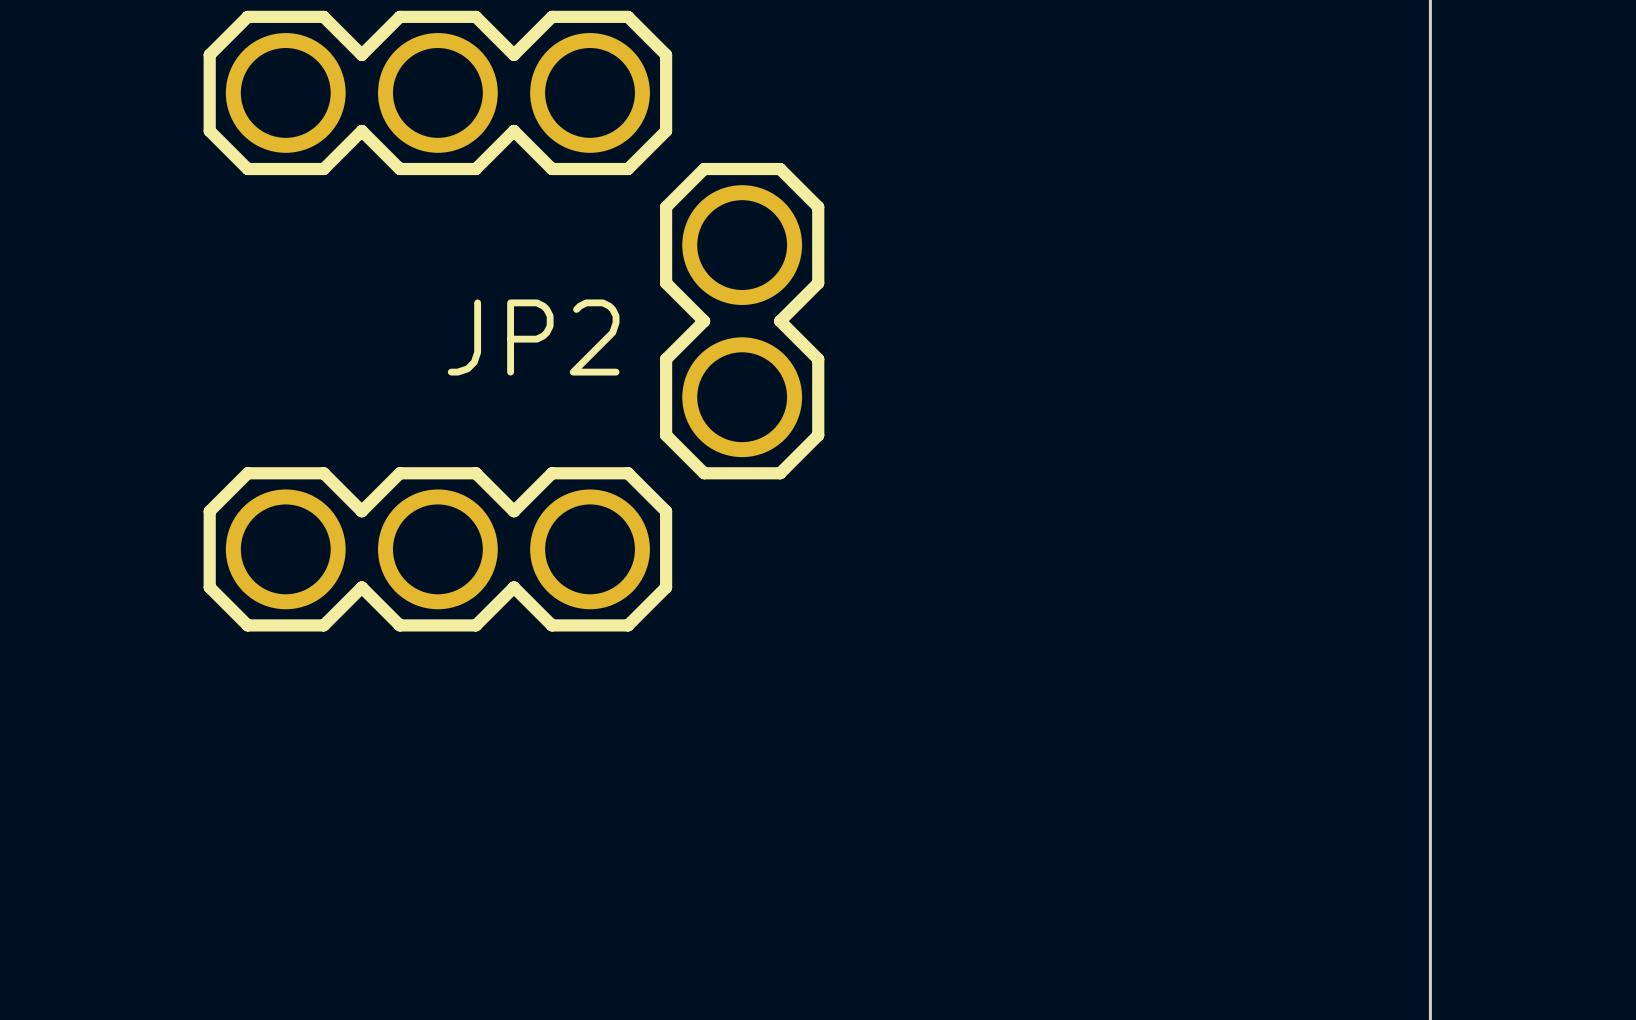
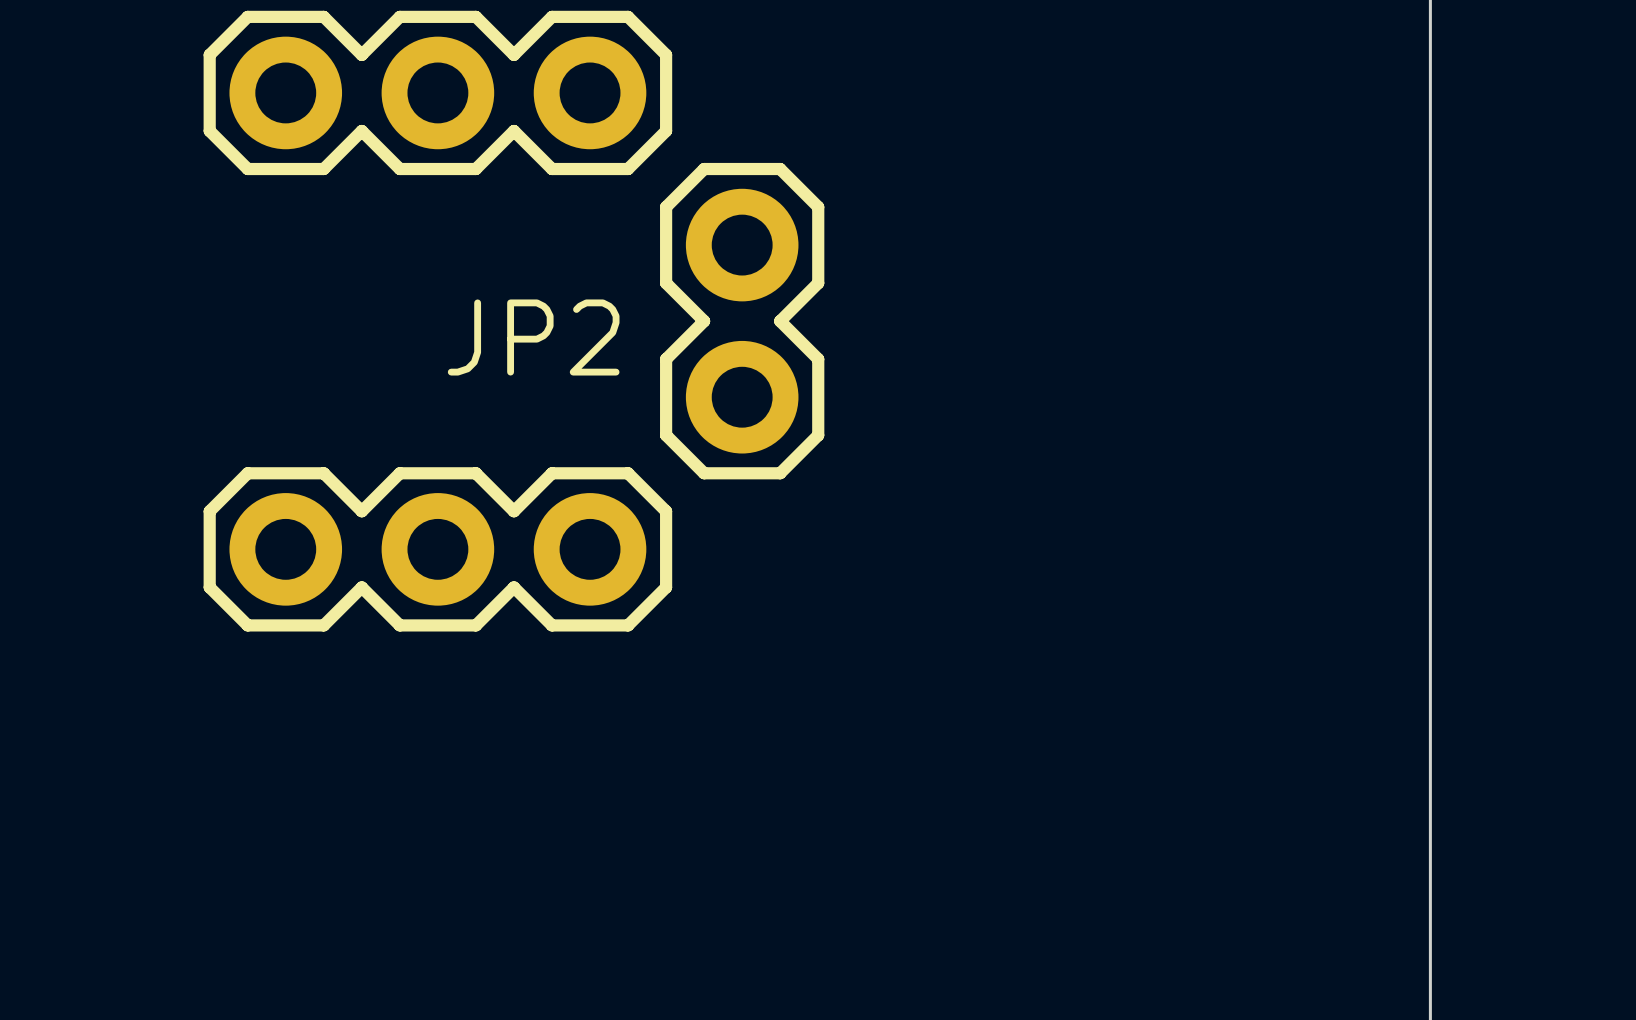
JP2 footprint: [203, 10, 673, 176] -> [203, 10, 673, 176]
part footprint: [660, 162, 825, 480] -> [660, 162, 825, 480]
part footprint: [203, 467, 673, 632] -> [203, 467, 673, 632]

